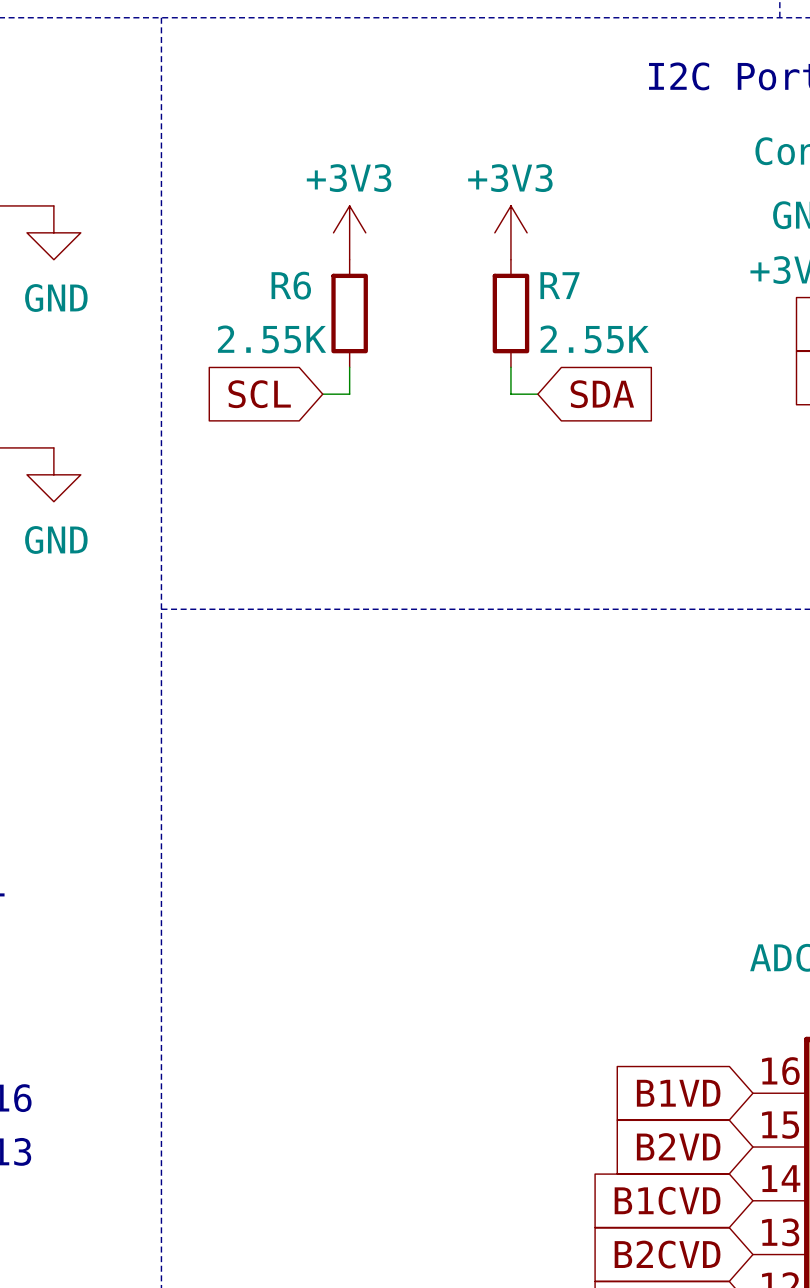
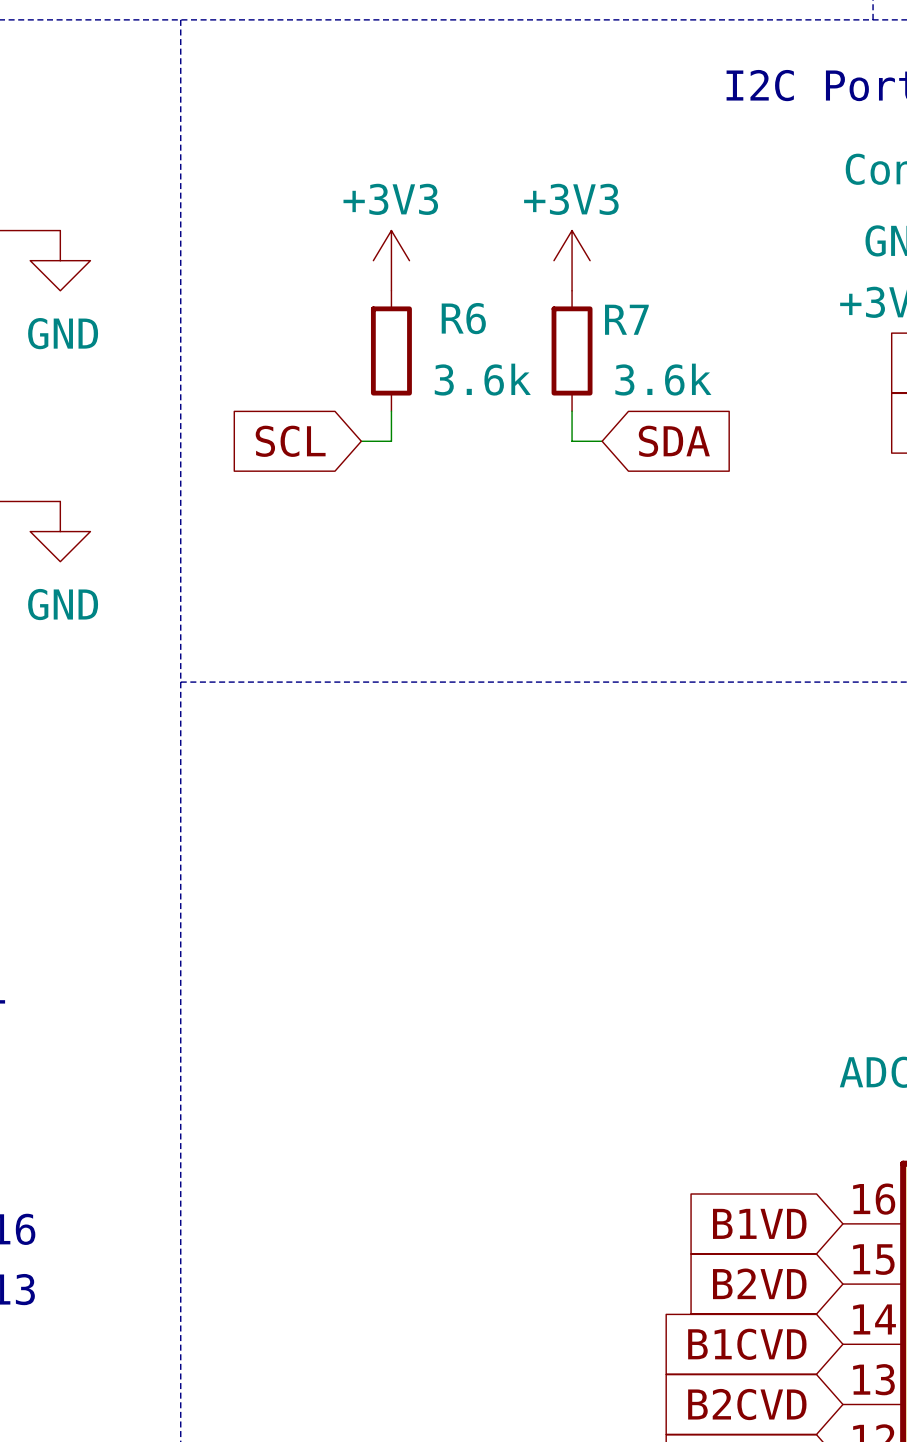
R6 name position: R6 (291, 285) -> R6 (463, 318)
R6 value: 2.55K (272, 339) -> 3.6k (482, 379)
R7 value: 2.55K (594, 339) -> 3.6k (663, 379)

